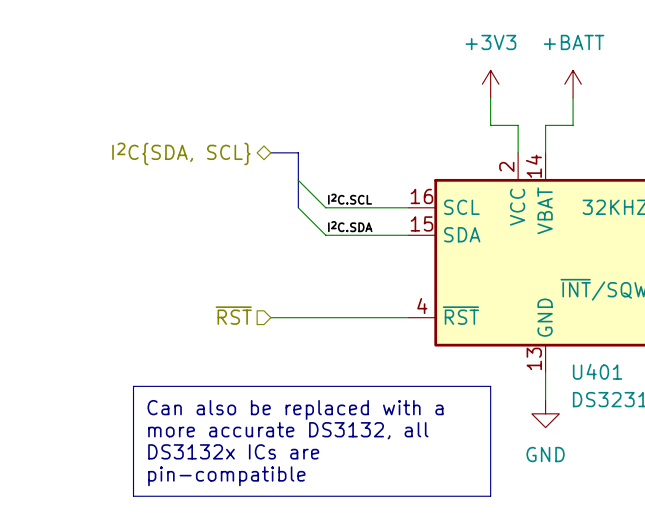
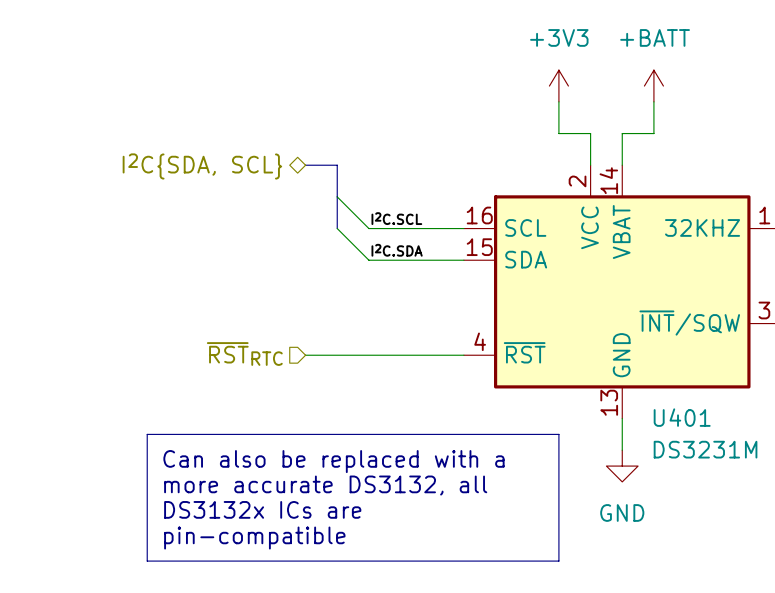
hierarchical label: ~{RST} (233, 315) -> ~{RST}RTC (244, 354)

